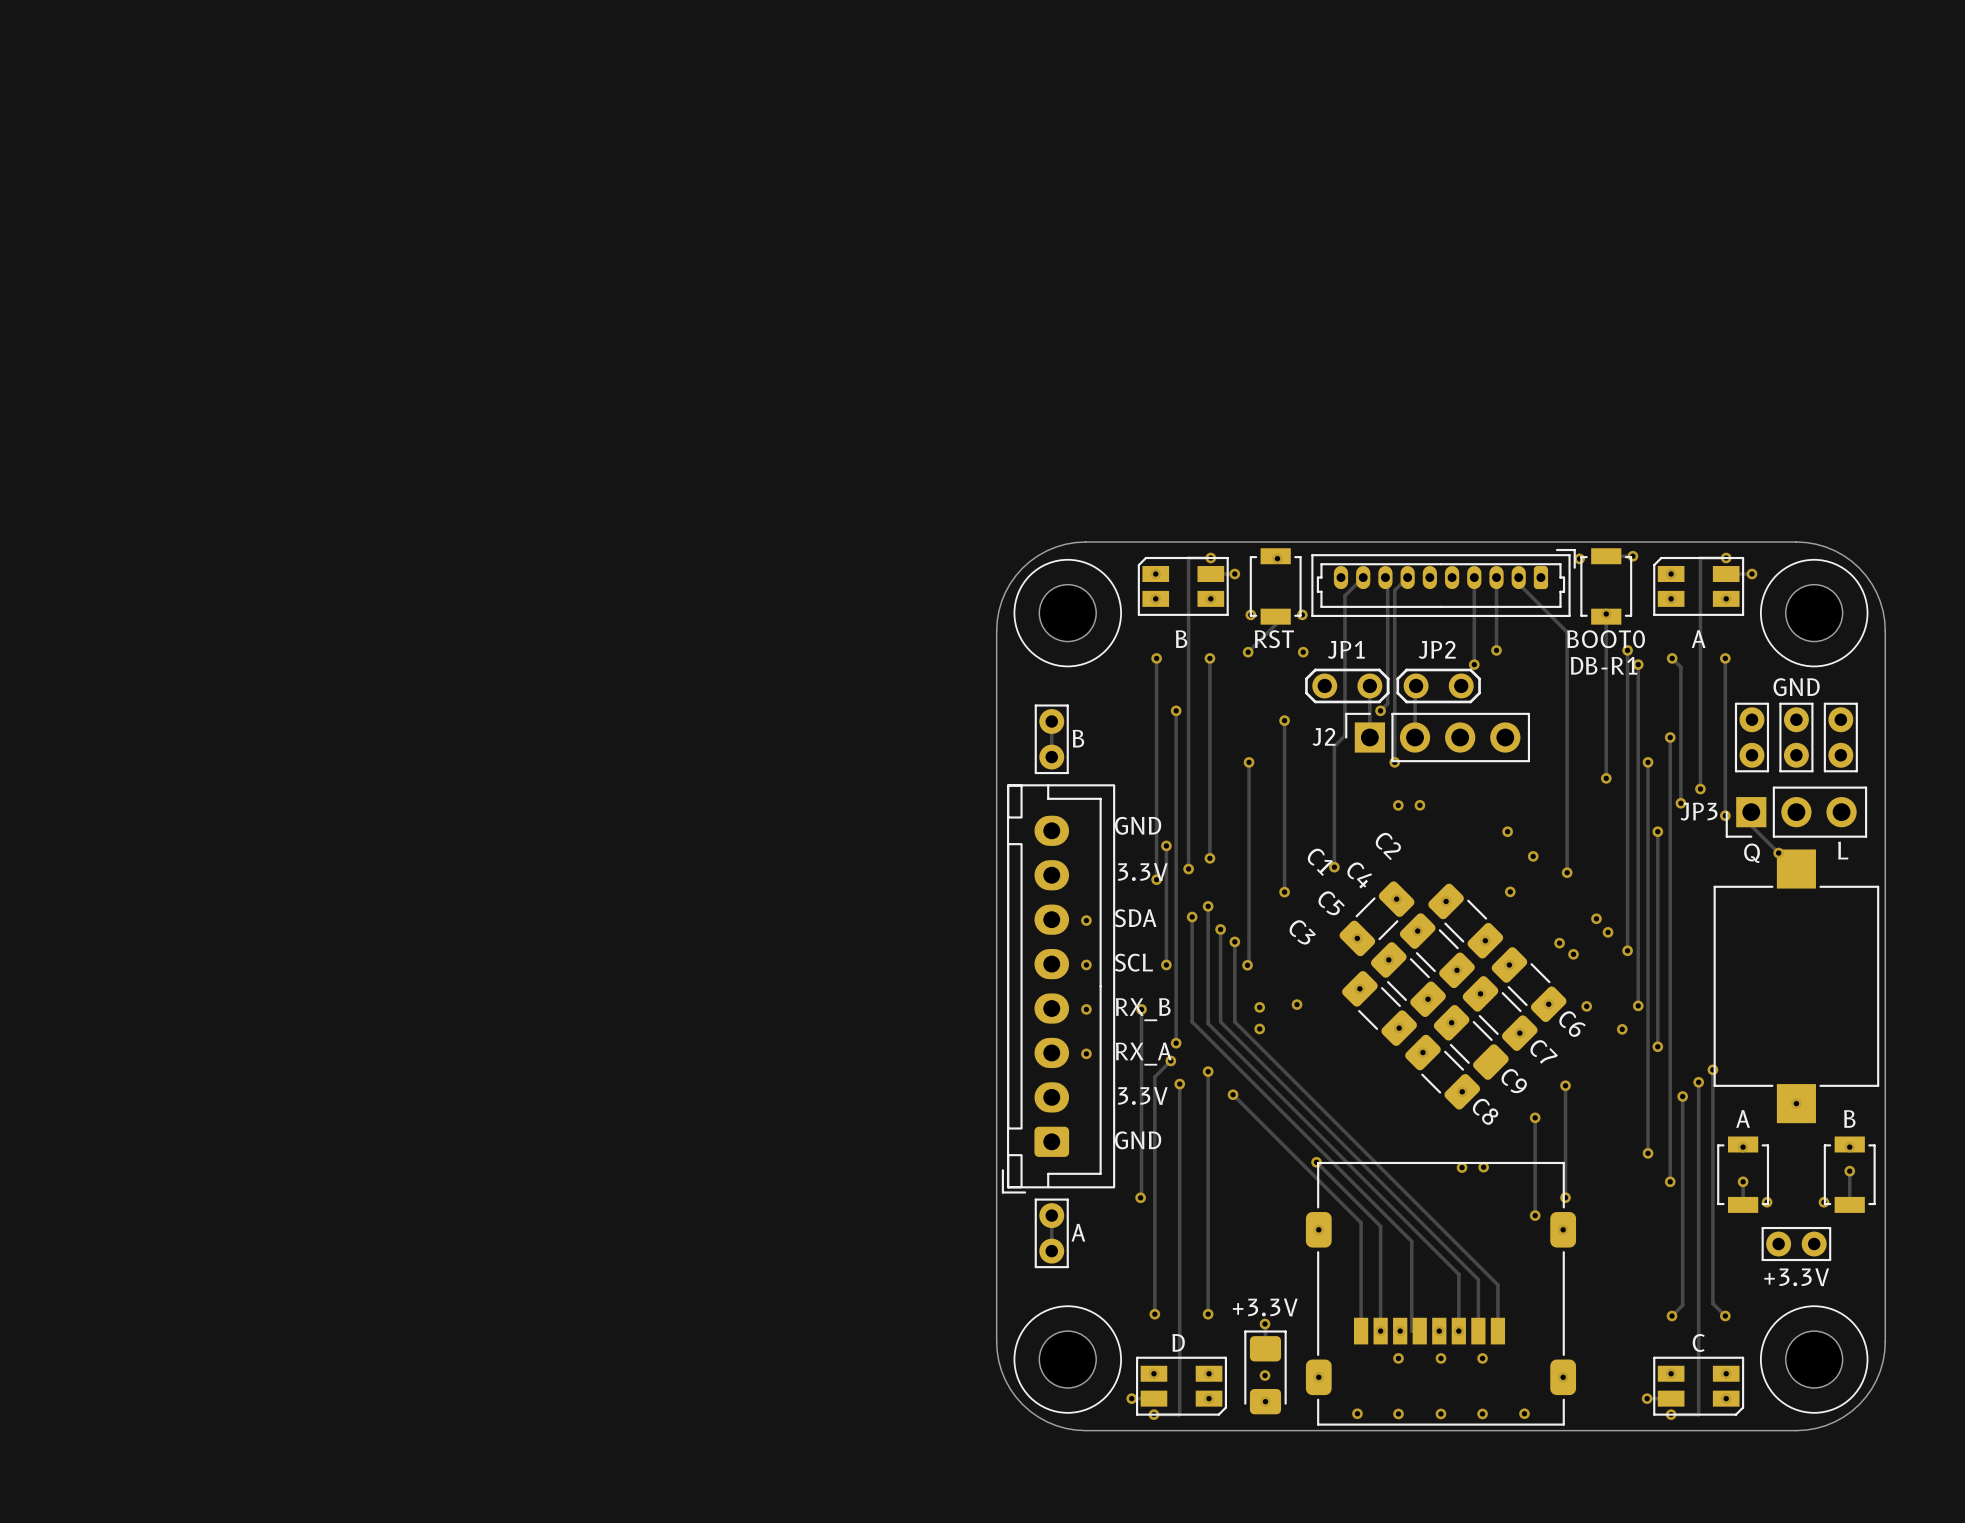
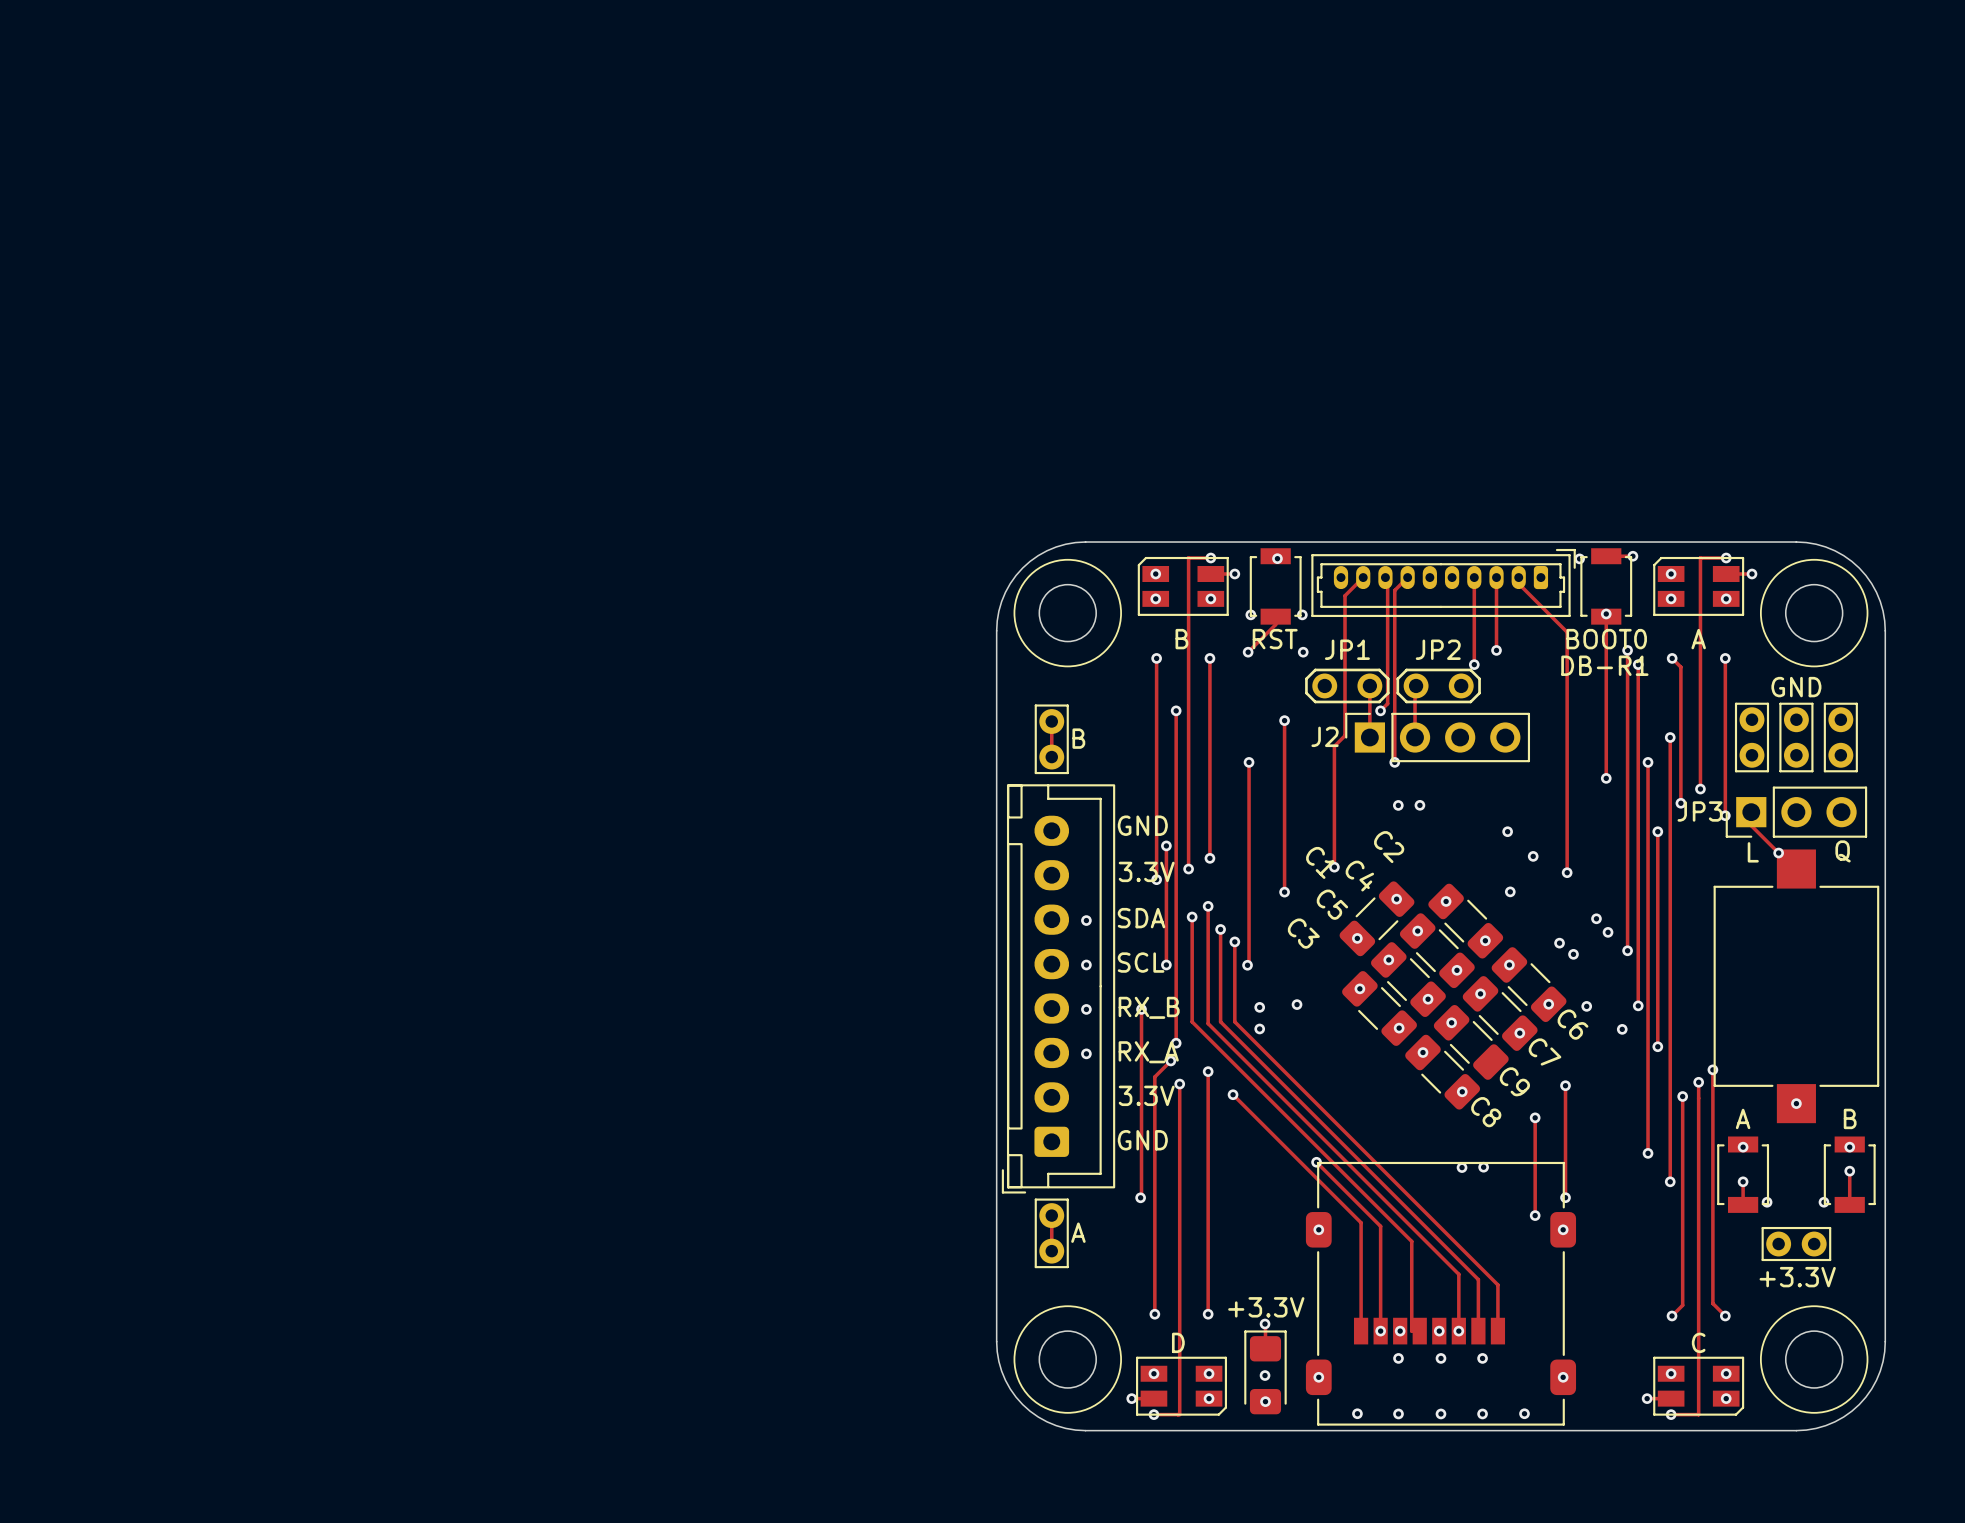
text: L (1843, 850) -> Q (1843, 851)
text: Q (1751, 853) -> L (1753, 852)

